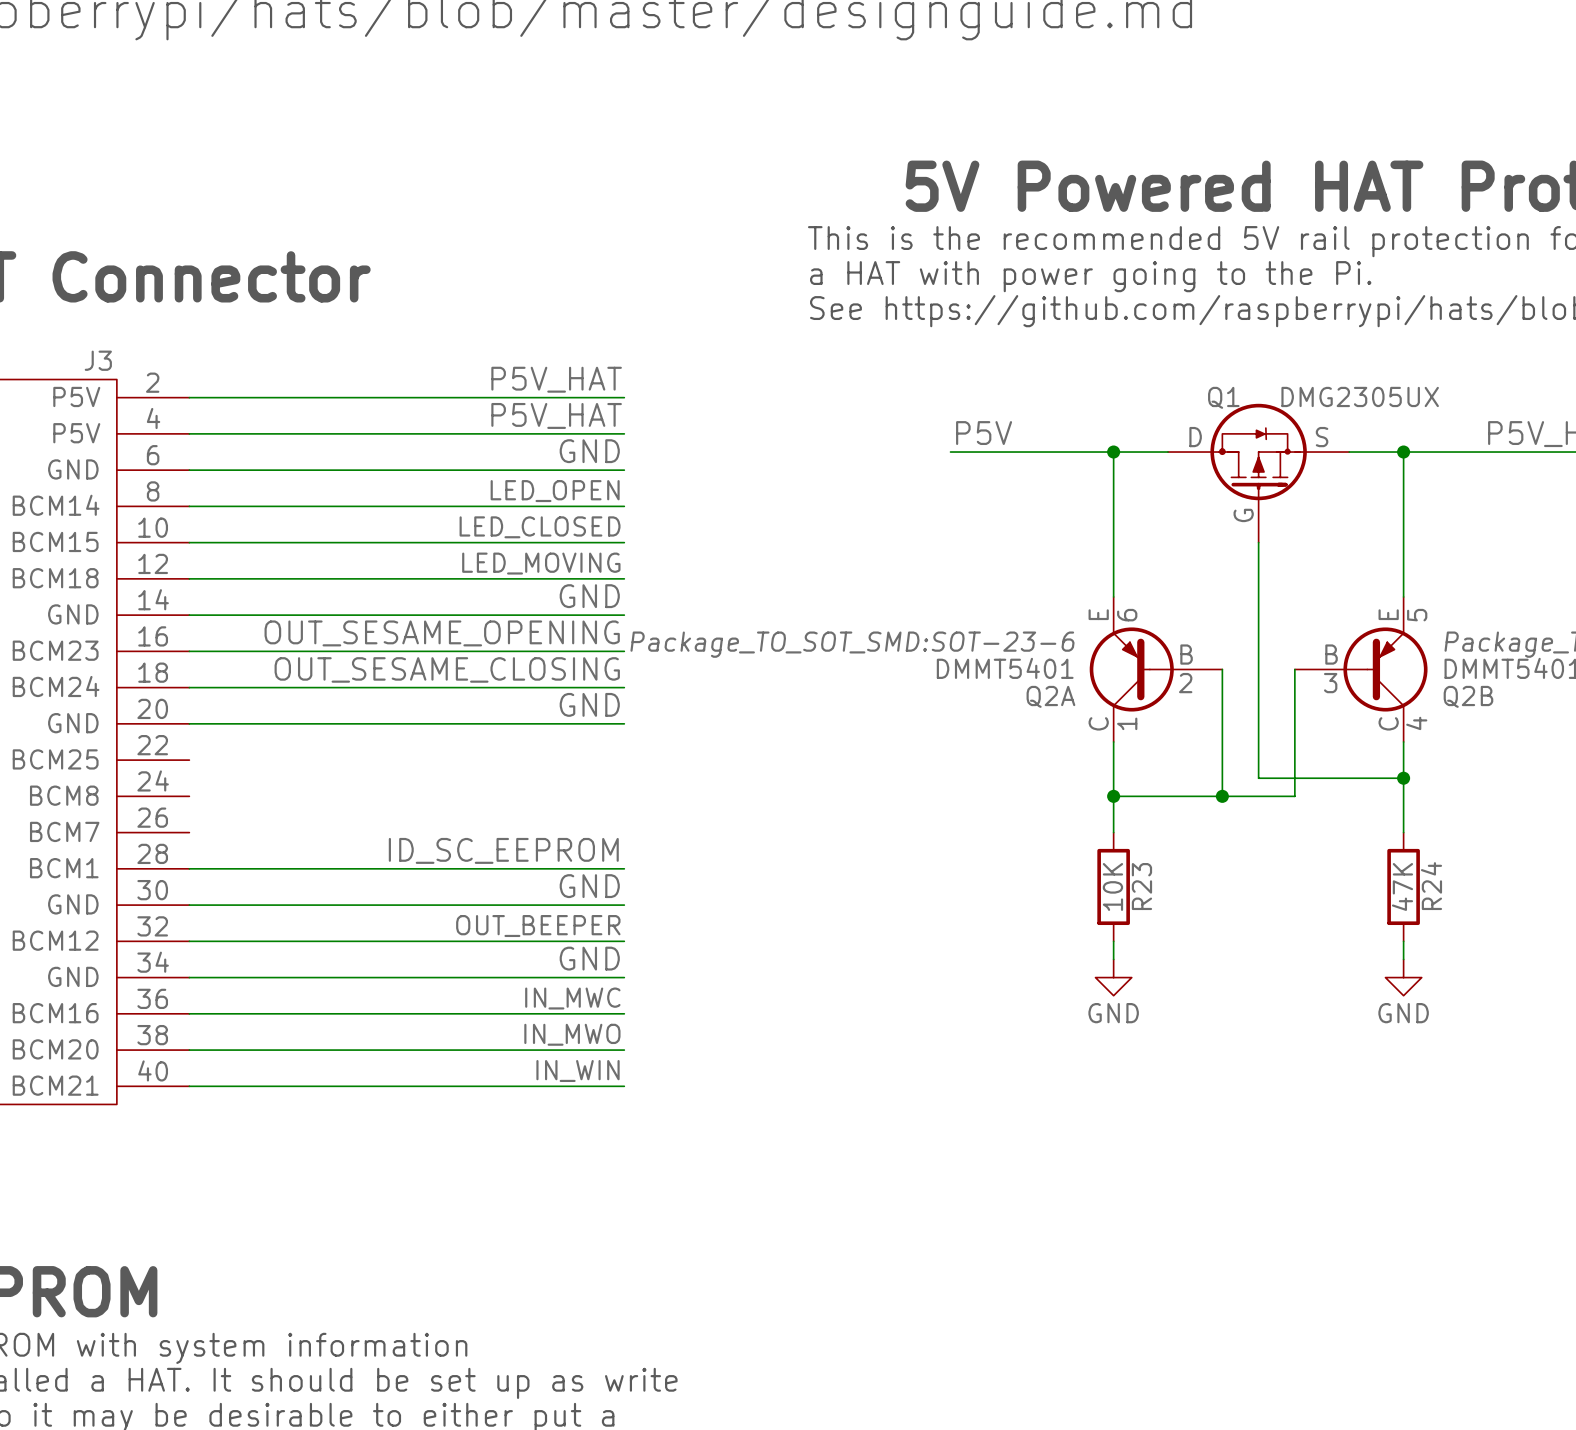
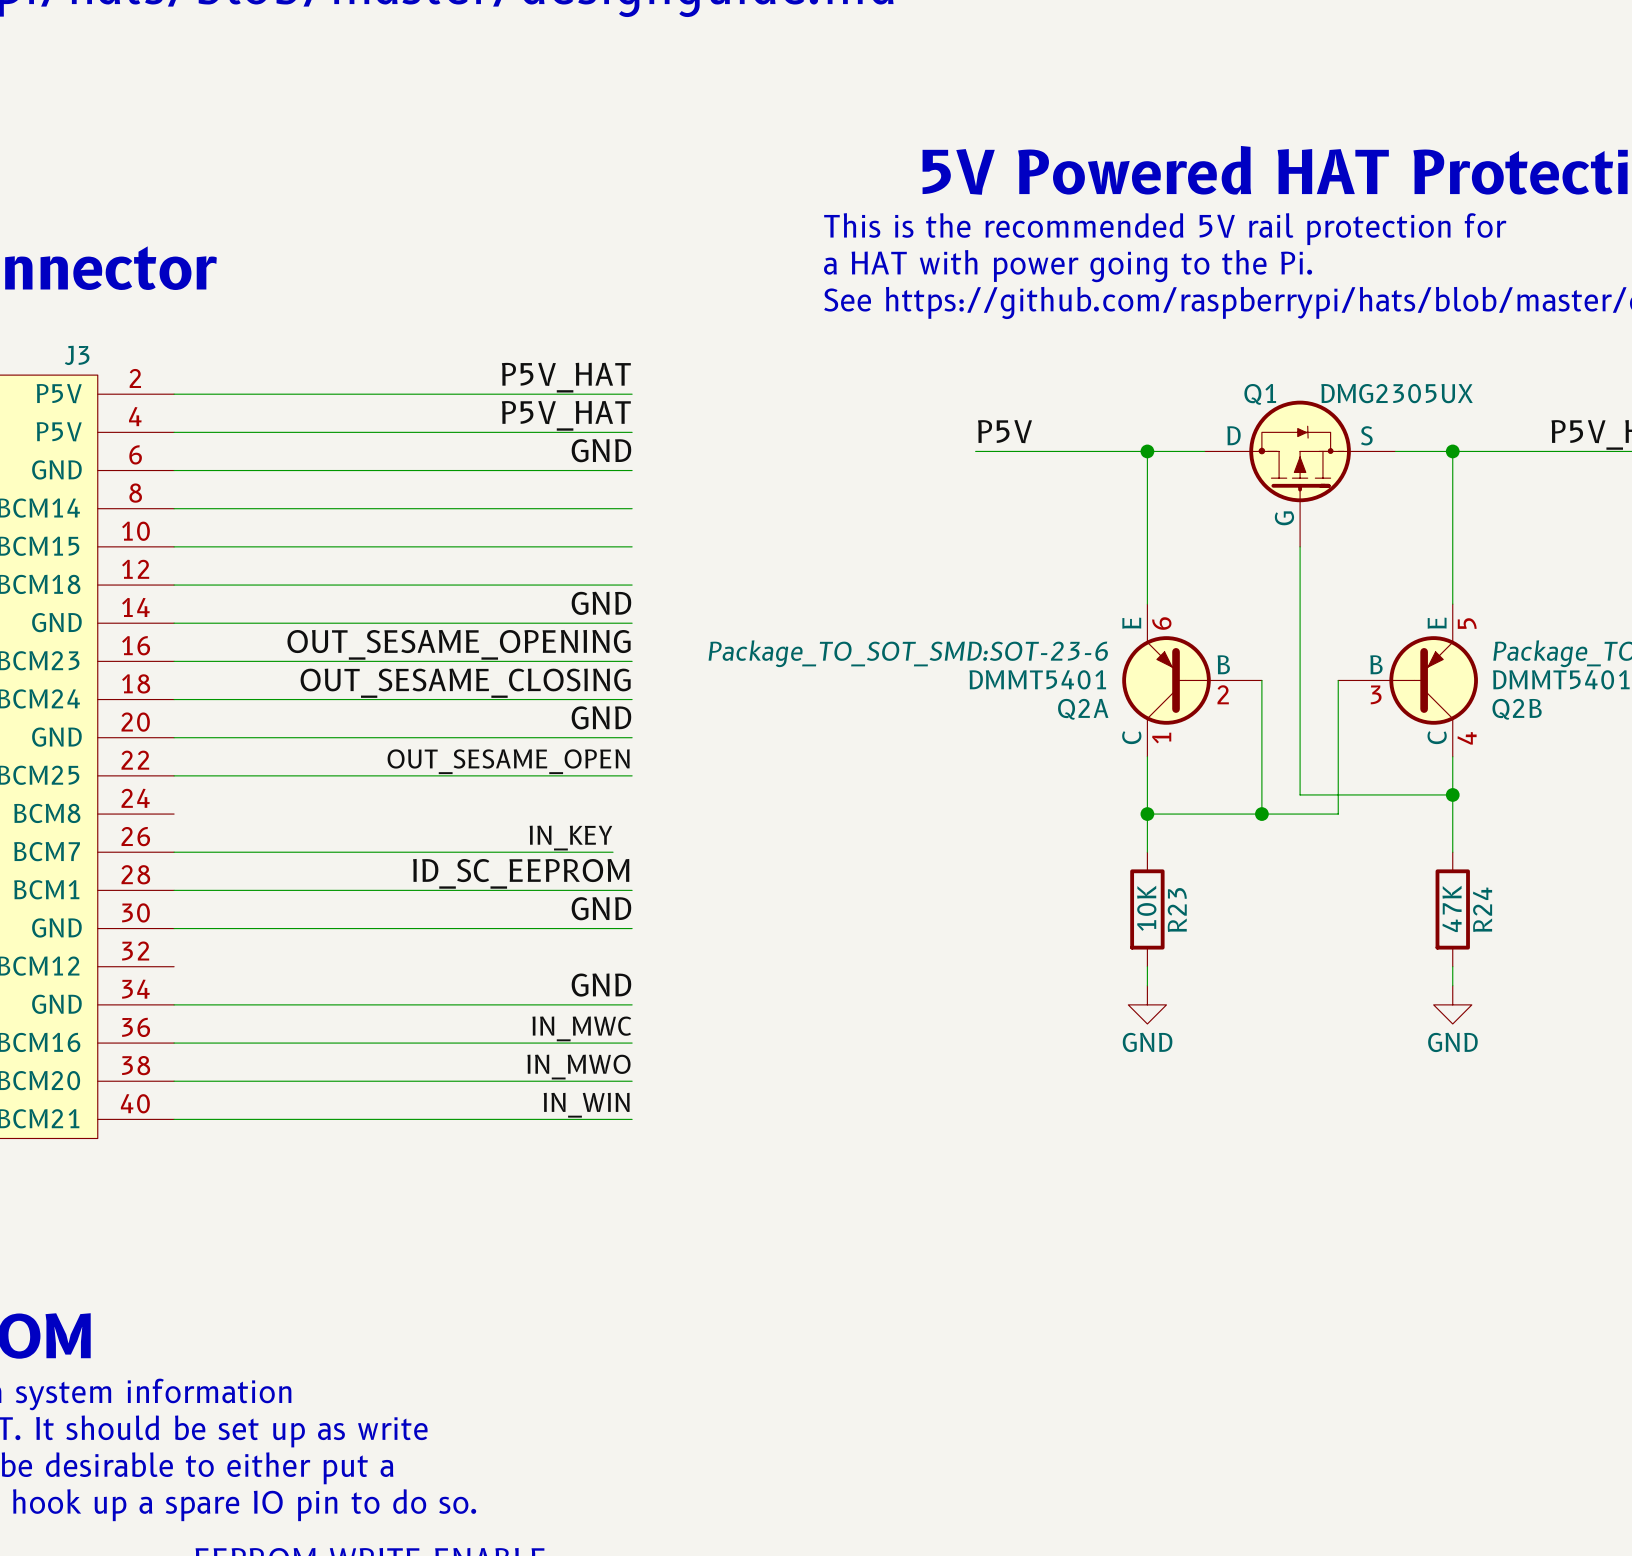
label: LED_OPEN (555, 491) -> none
label: LED_CLOSED (540, 527) -> none
label: LED_MOVING (541, 563) -> none
label: none -> OUT_SESAME_OPEN (508, 761)
label: none -> IN_KEY (570, 838)
wire: none -> (174, 852) (613, 852)
label: OUT_BEEPER (538, 926) -> none
wire: (189, 941) (624, 941) -> (174, 775) (632, 775)

